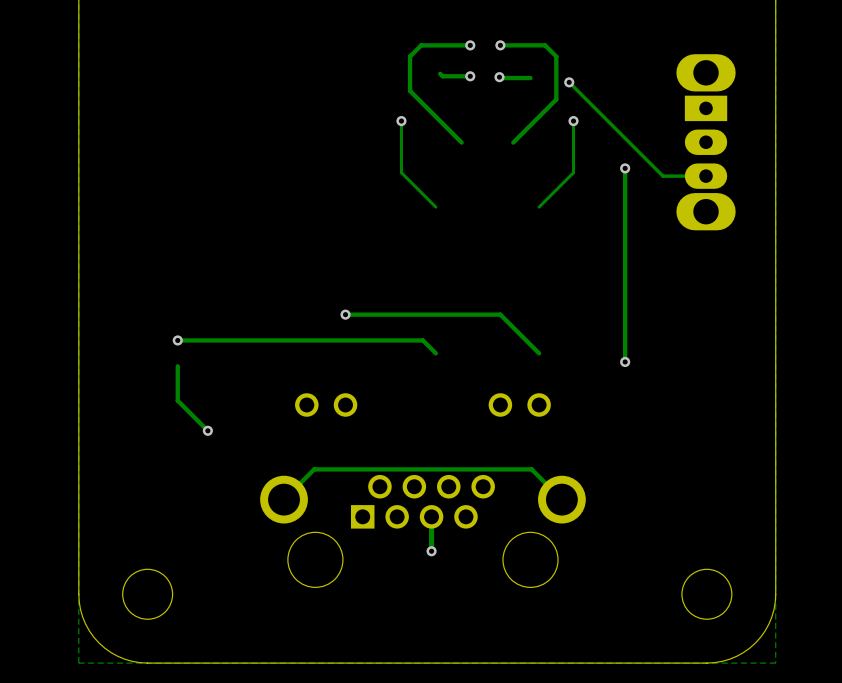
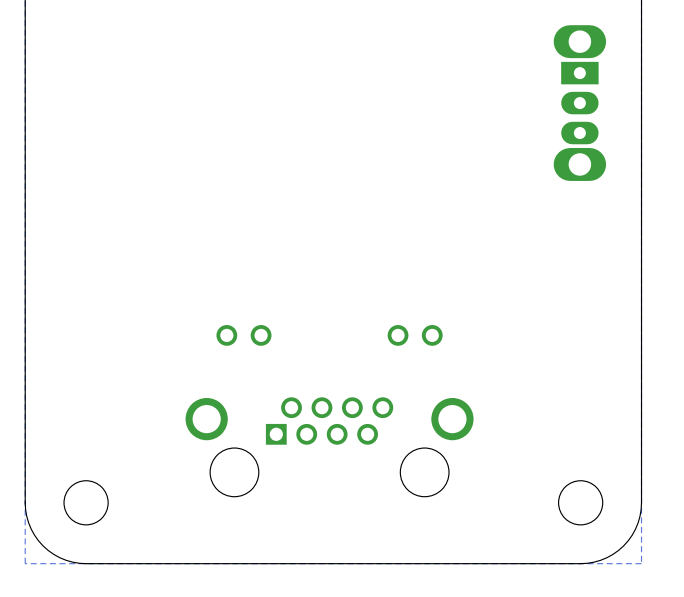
track: (470, 45) (421, 45) (410, 56) (410, 90) (461, 142) -> none
via: (470, 45) -> none
track: (500, 45) (545, 45) (556, 56) (556, 99) (513, 142) -> none
via: (500, 45) -> none
track: (440, 73) (442, 76) (470, 76) -> none
via: (470, 76) -> none
track: (499, 77) (530, 78) -> none
via: (499, 77) -> none
track: (569, 82) (663, 176) (706, 176) -> none
via: (569, 82) -> none
track: (401, 121) (401, 172) (435, 207) -> none
via: (401, 121) -> none
track: (573, 121) (573, 172) (539, 207) -> none
via: (573, 121) -> none
track: (625, 168) (625, 361) -> none
via: (625, 168) -> none
track: (345, 314) (500, 314) (539, 353) -> none
via: (345, 314) -> none
track: (177, 340) (422, 340) (435, 353) -> none
via: (177, 340) -> none
via: (625, 361) -> none
track: (177, 366) (177, 400) (207, 430) -> none
via: (207, 430) -> none
track: (561, 499) (531, 469) (314, 469) (284, 499) -> none
track: (431, 516) (431, 551) -> none
via: (431, 551) -> none

